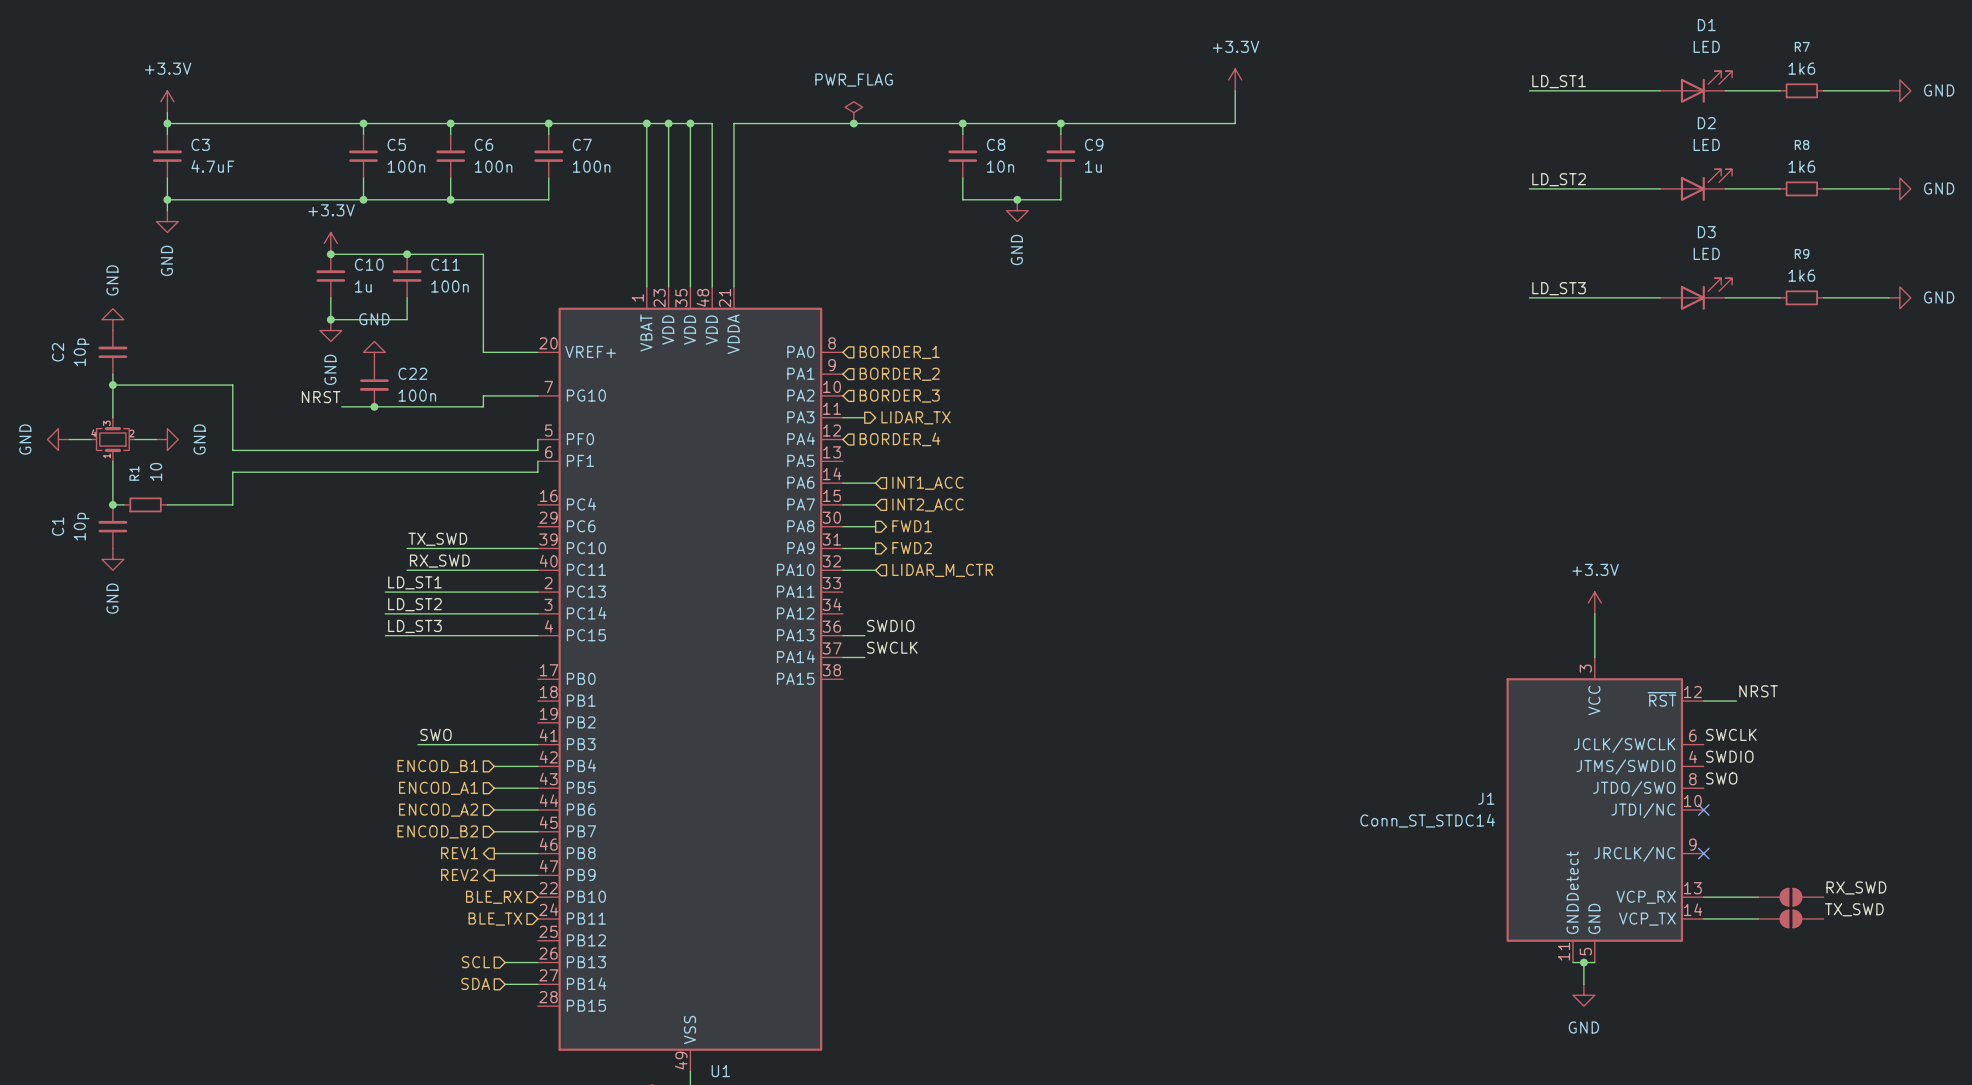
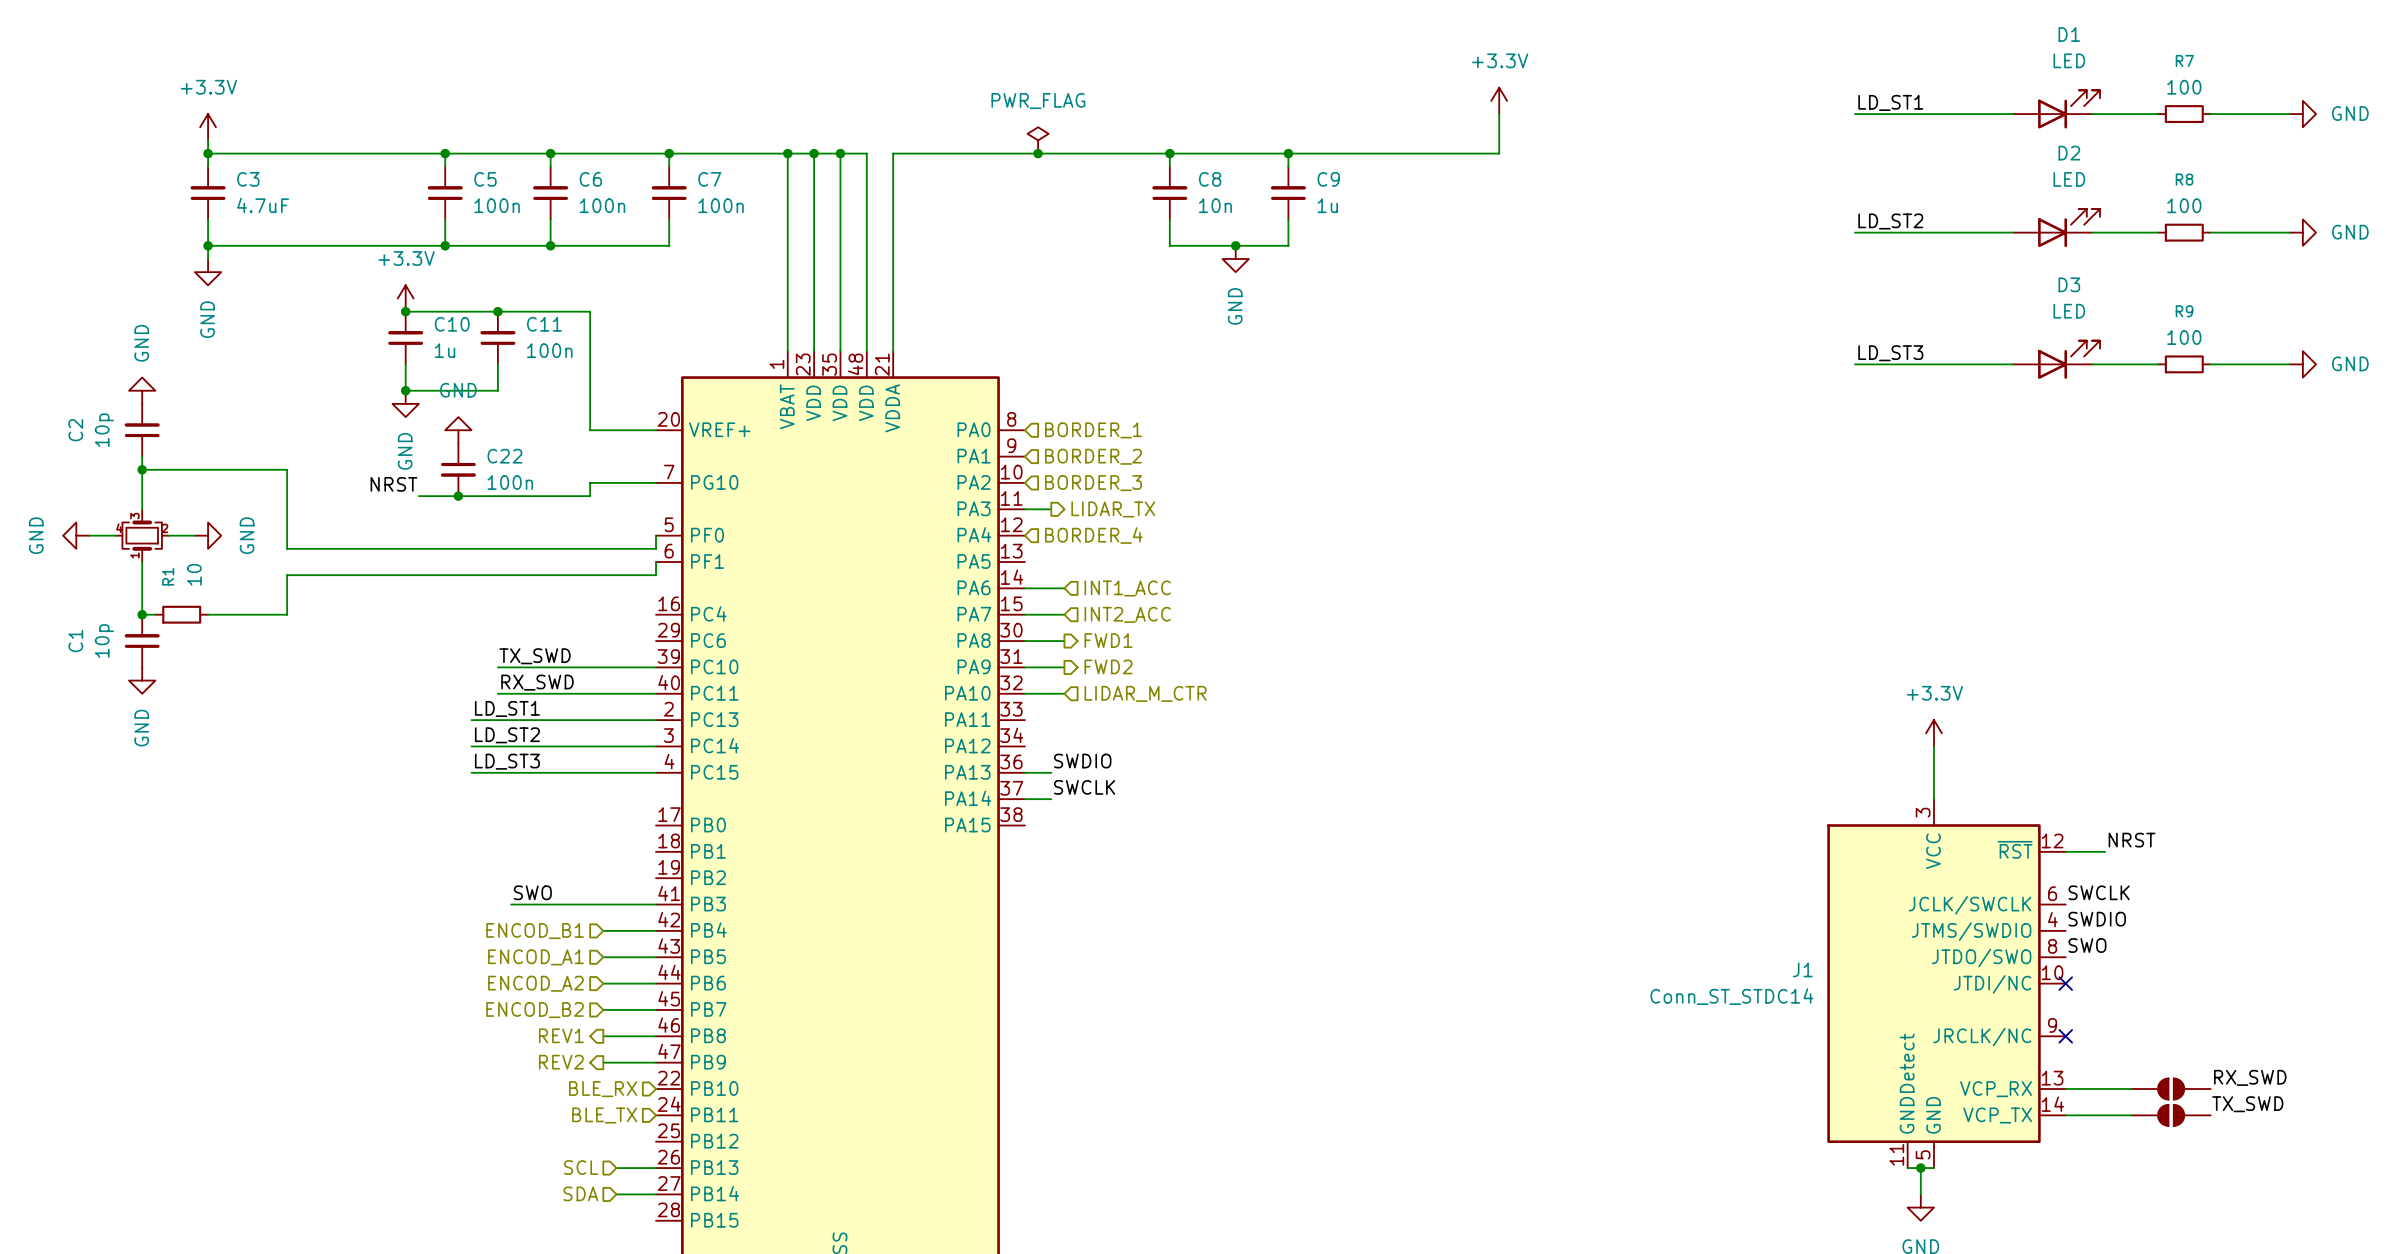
R7 value: 1k6 (1801, 68) -> 100 (2184, 87)
R8 value: 1k6 (1801, 166) -> 100 (2184, 205)
R9 value: 1k6 (1801, 275) -> 100 (2184, 337)

